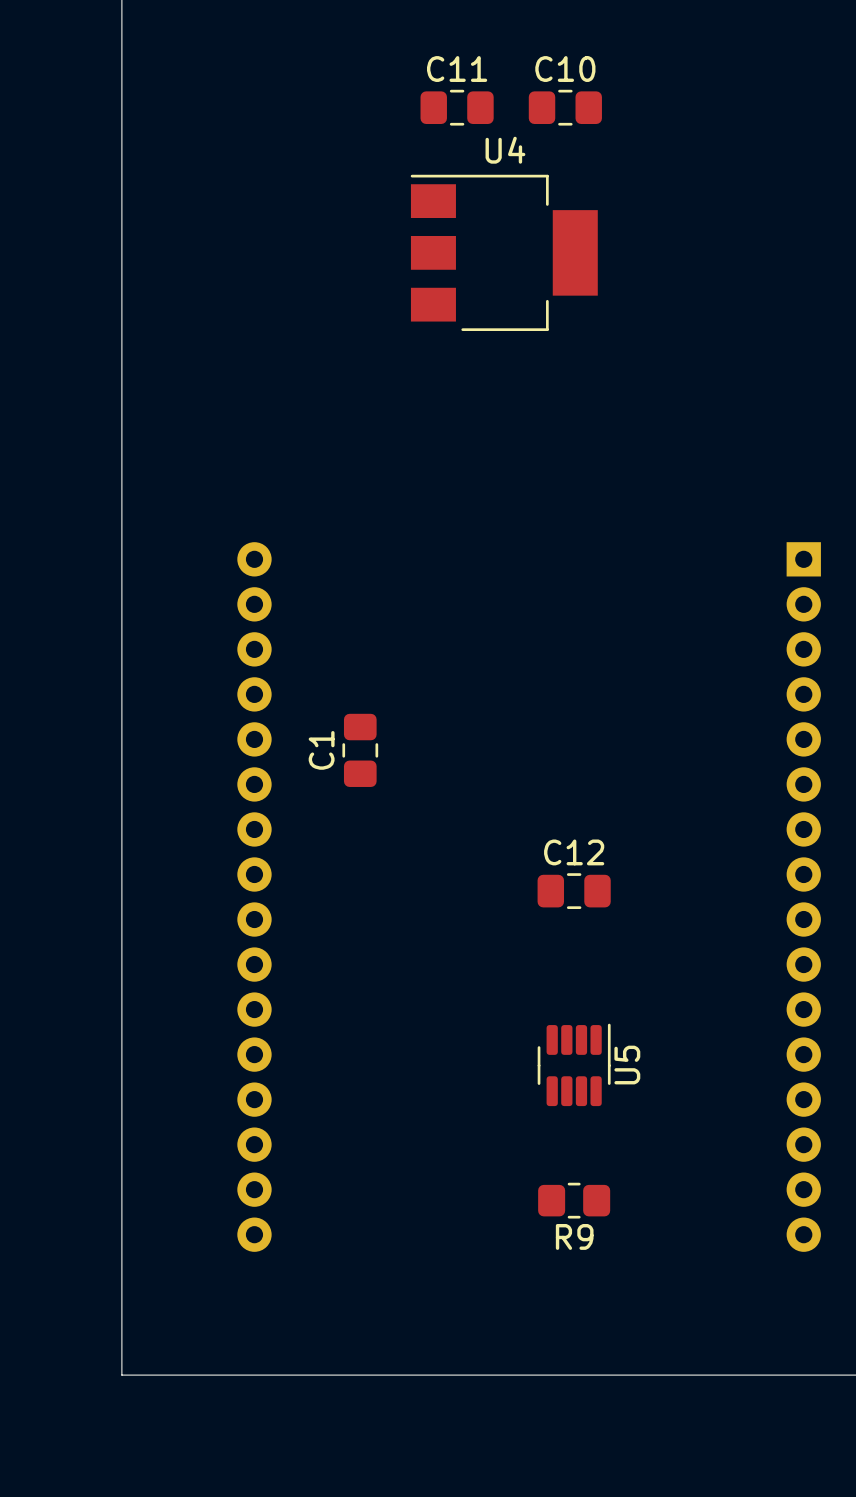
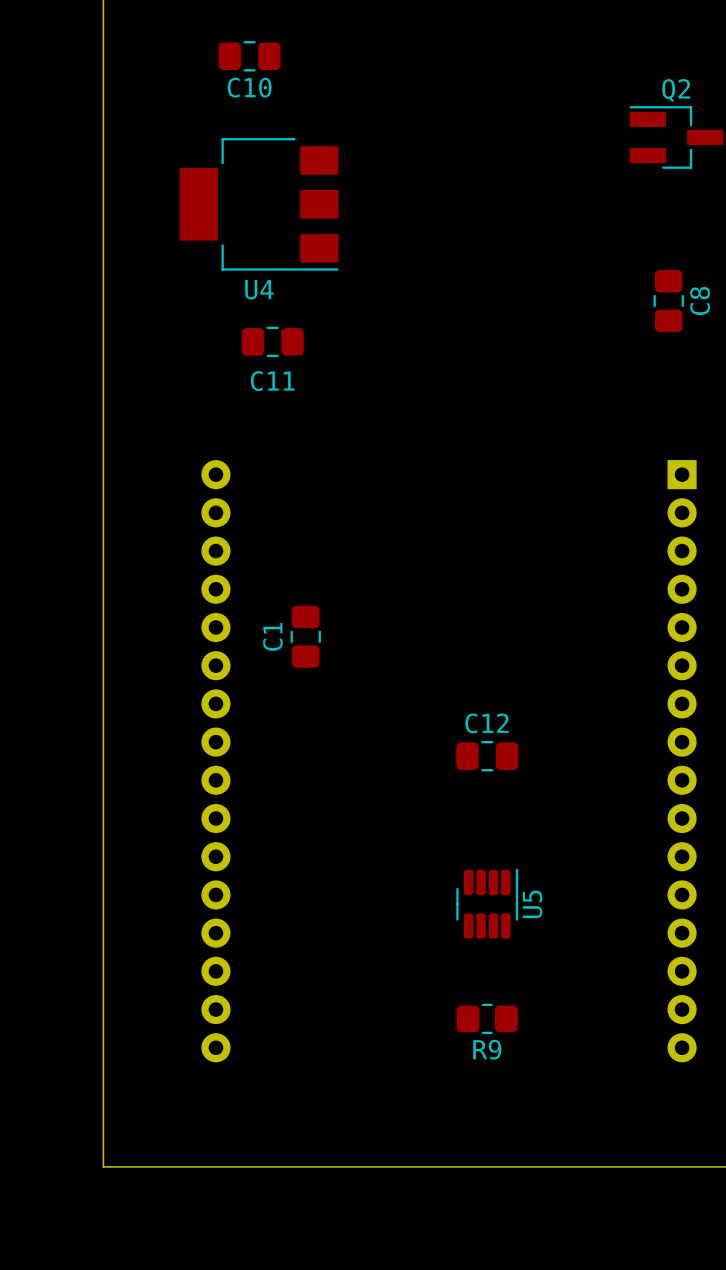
C11 name position: C11 (457, 69) -> C11 (272, 381)
C10 name position: C10 (565, 69) -> C10 (249, 87)
C11 position: (457, 107) -> (272, 341)
C10 position: (565, 107) -> (249, 56)
Q2: none -> (676, 137)
U4 rotation: 0° (504, 252) -> 180° (259, 204)
U4 position: (504, 252) -> (259, 204)
C8: none -> (668, 301)

